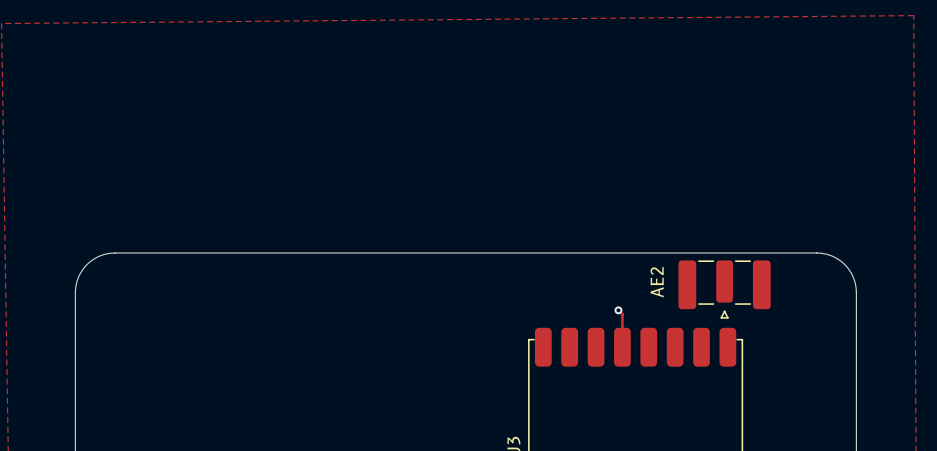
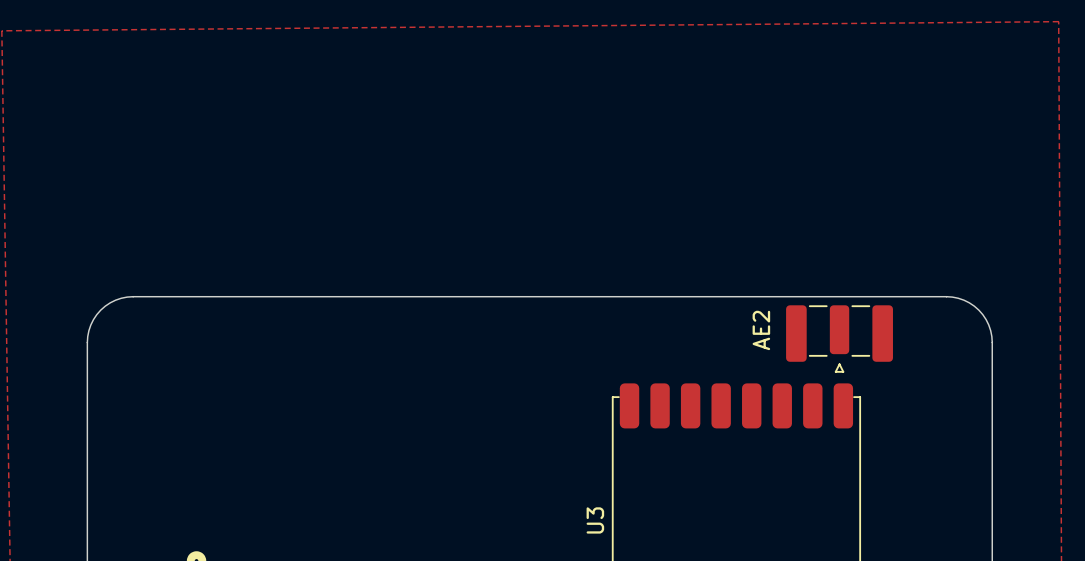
track: (618, 310) (622, 314) (622, 347) -> none
via: (618, 310) -> none

